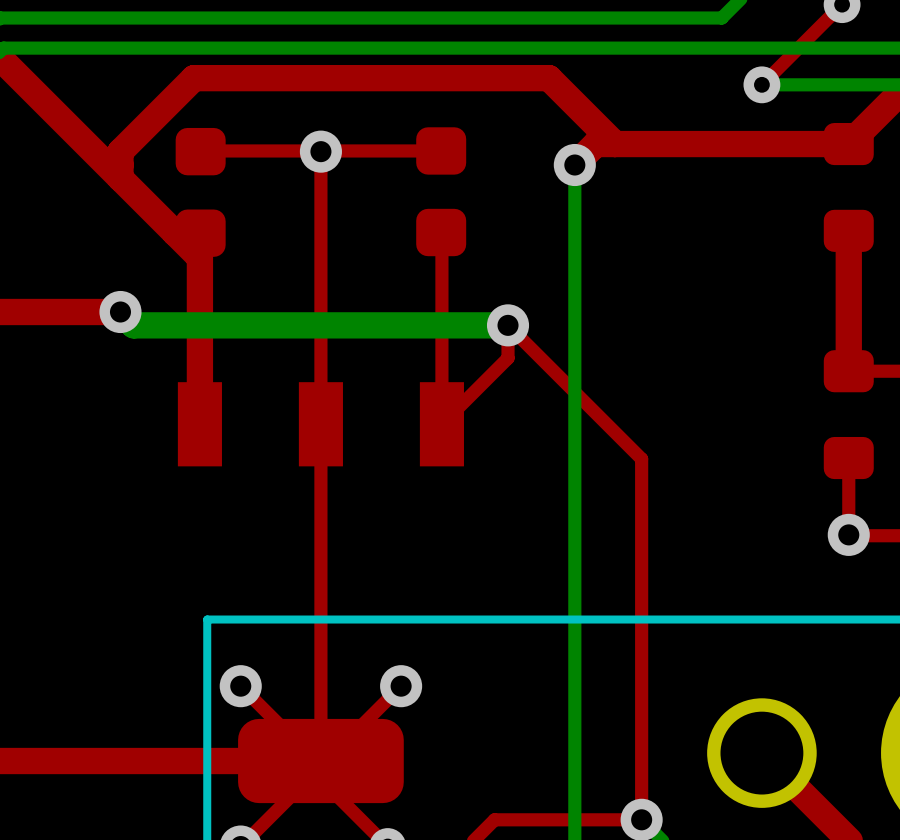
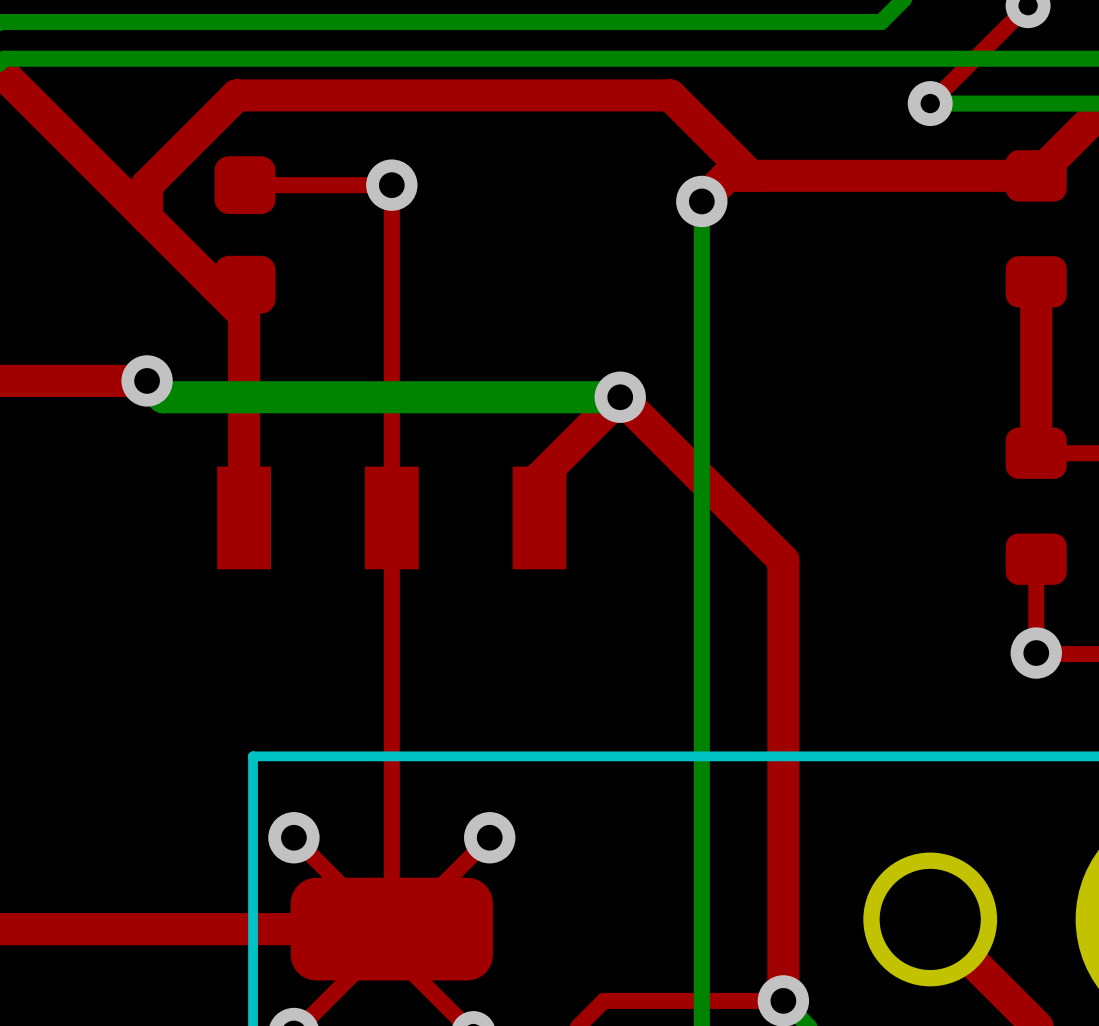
top track: (441, 150) (201, 150) -> (391, 185) (244, 185)
part: (441, 191) -> none
top track: (441, 233) (441, 391) -> none
top track: (508, 325) (508, 358) (441, 424) -> (620, 397) (539, 477)
top track width: thin (508, 325) (641, 459) (641, 819) -> thick (620, 397) (783, 560) (783, 1000)

